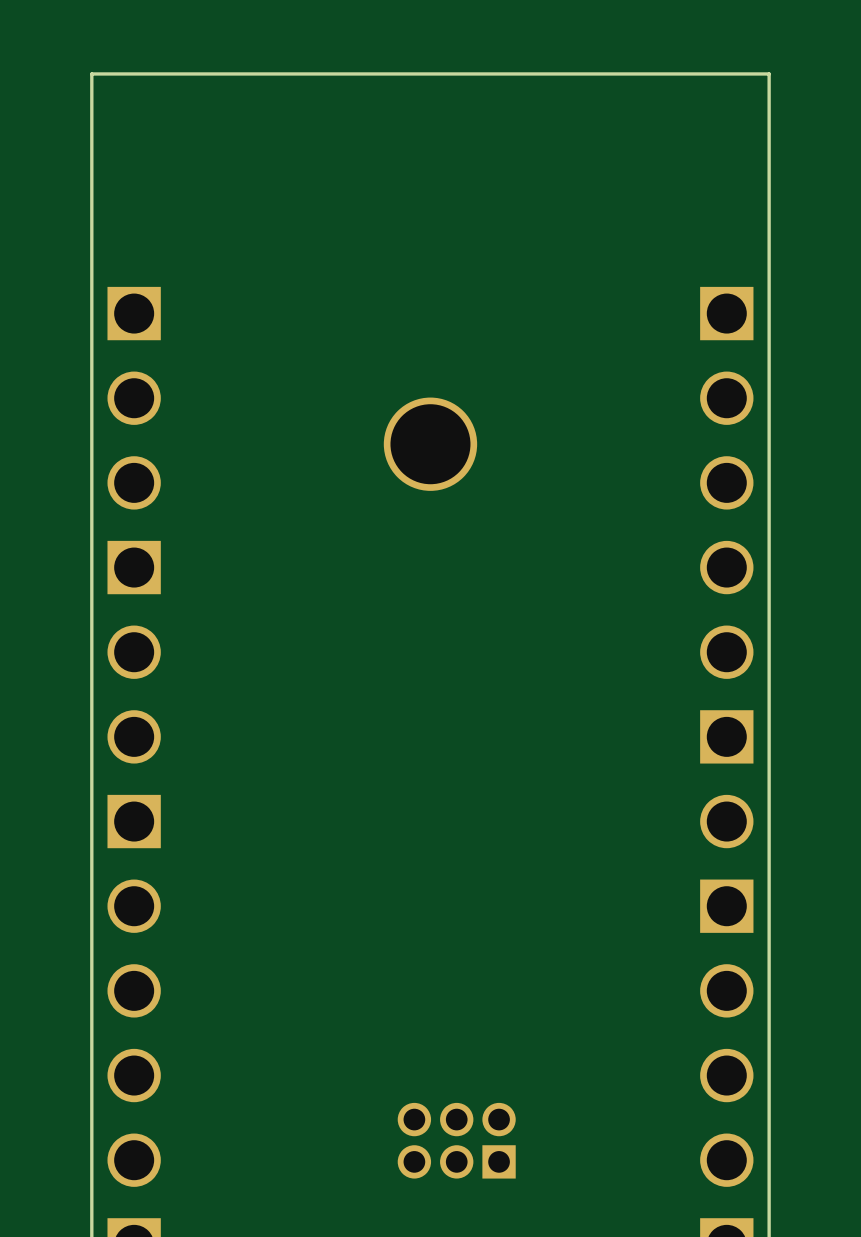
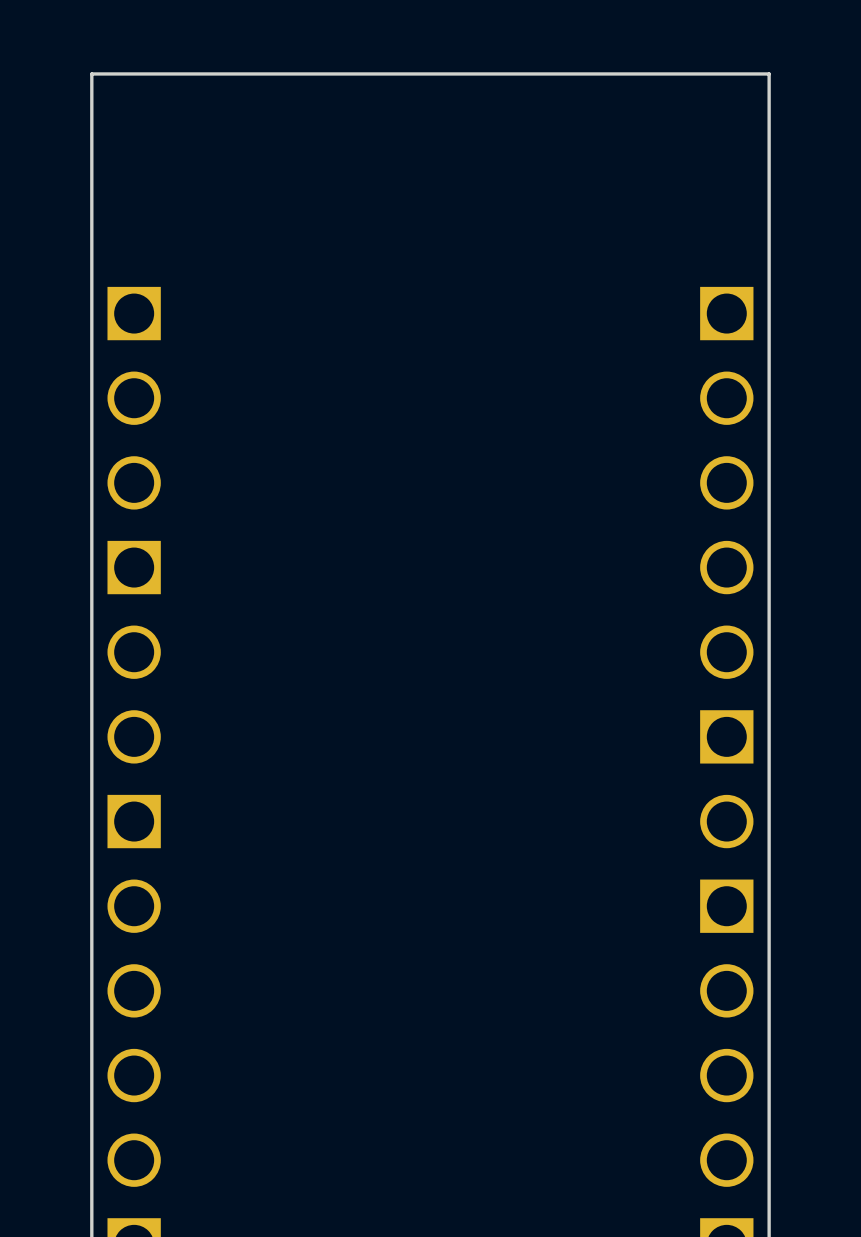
part: (430, 444) -> none
part: (456, 1140) -> none

